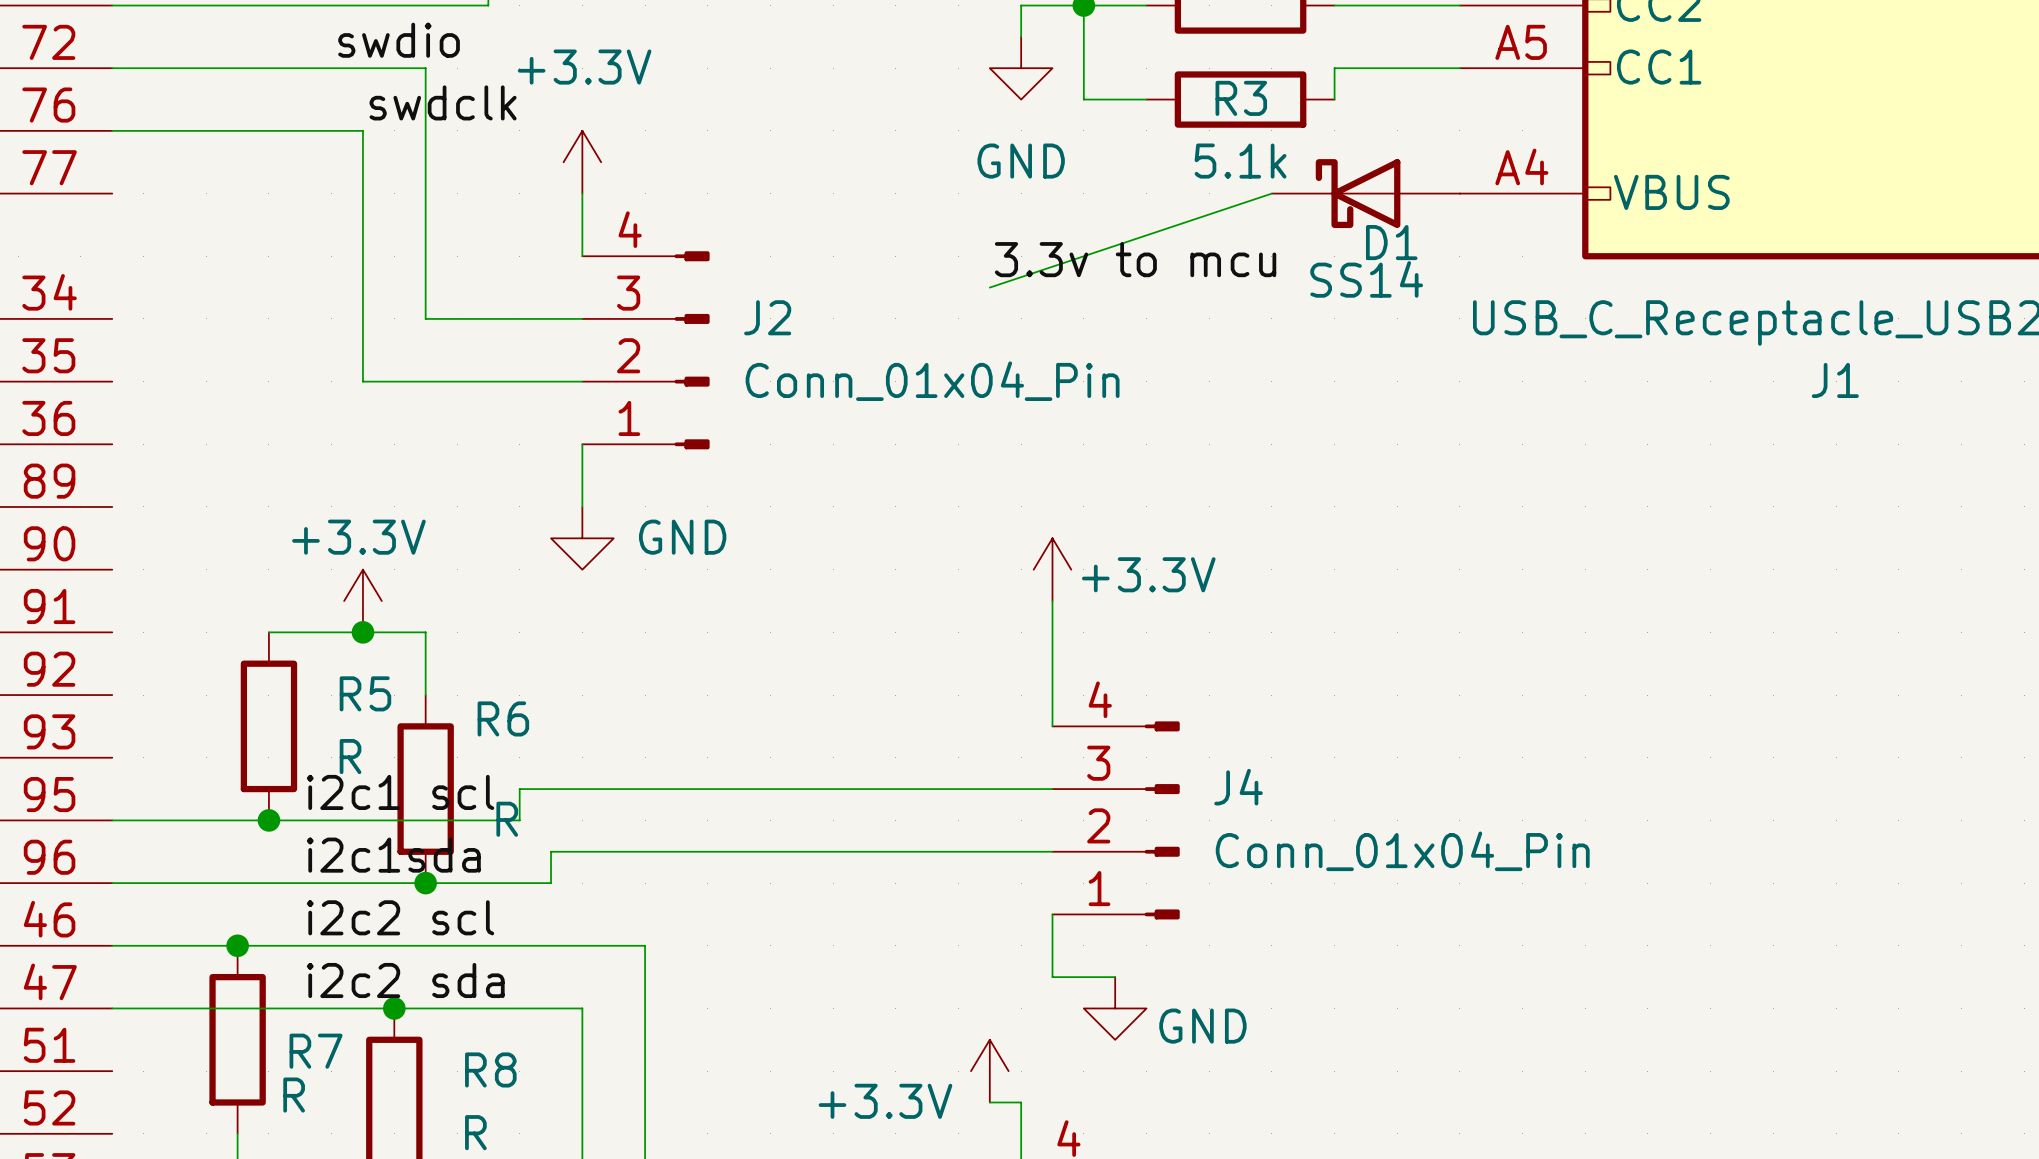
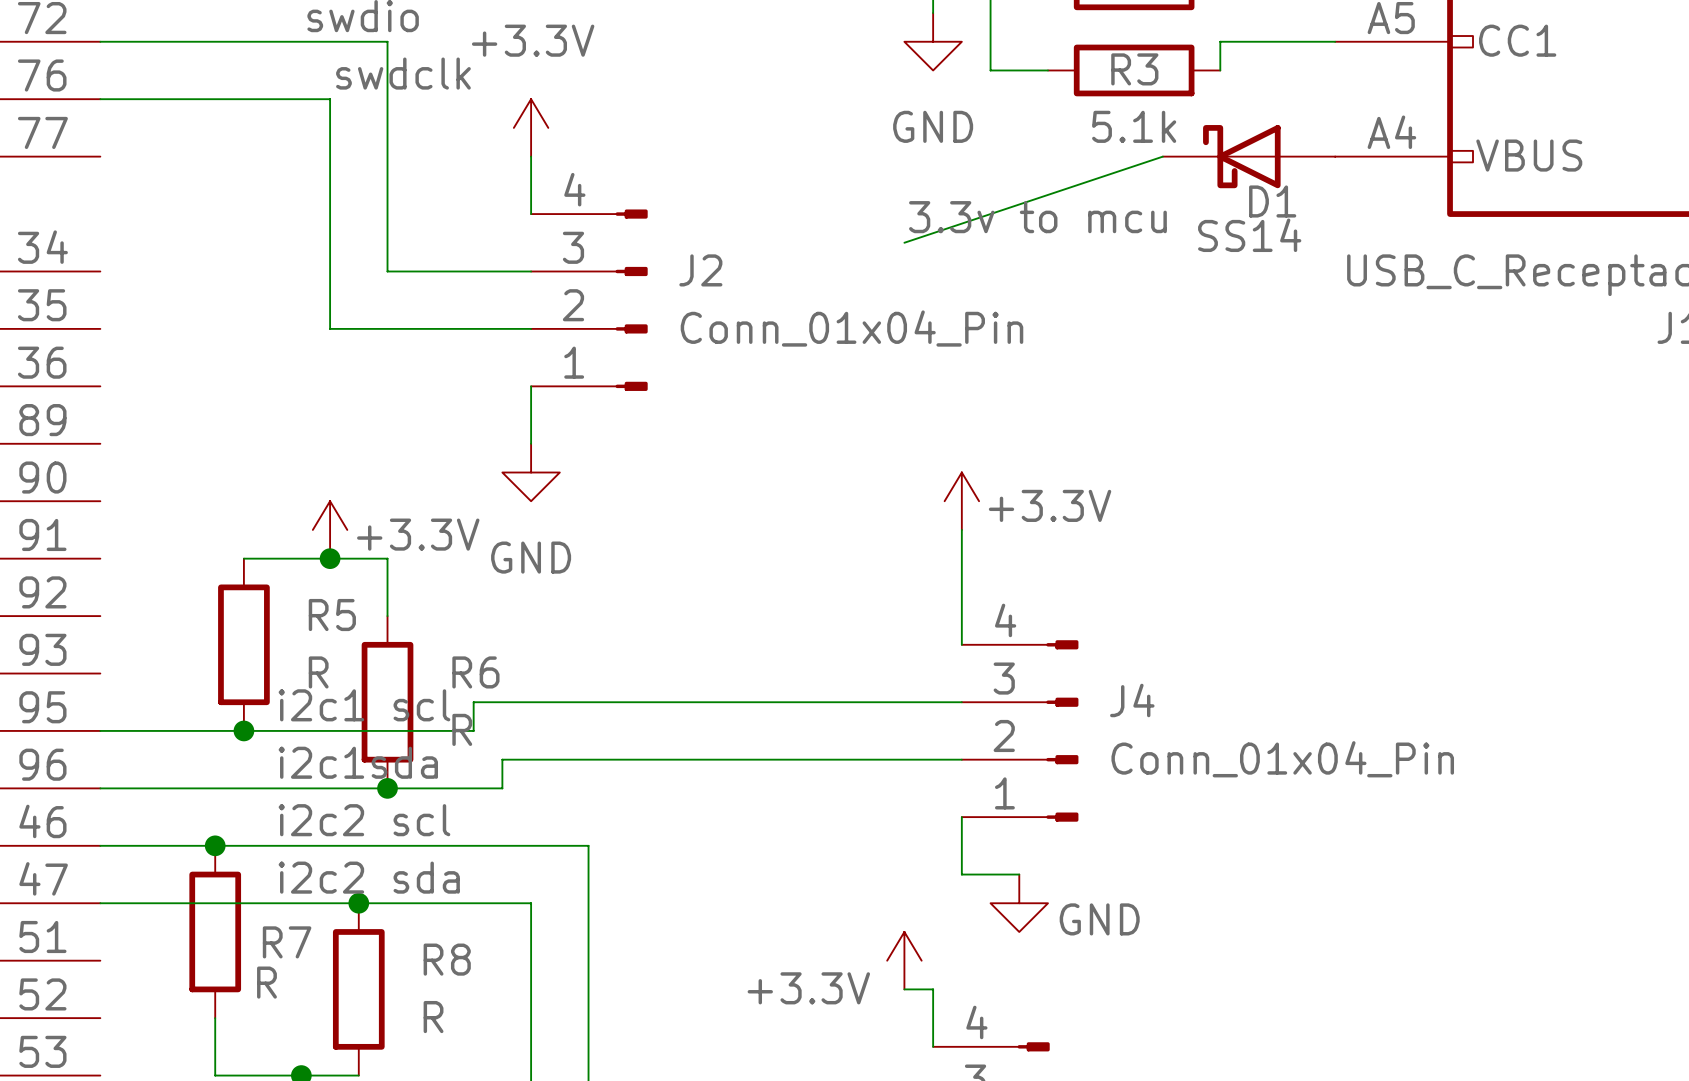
power symbol text position: +3.3V (358, 537) -> +3.3V (418, 534)
power symbol text position: GND (682, 537) -> GND (531, 557)
R6 name position: R6 (503, 718) -> R6 (475, 672)

